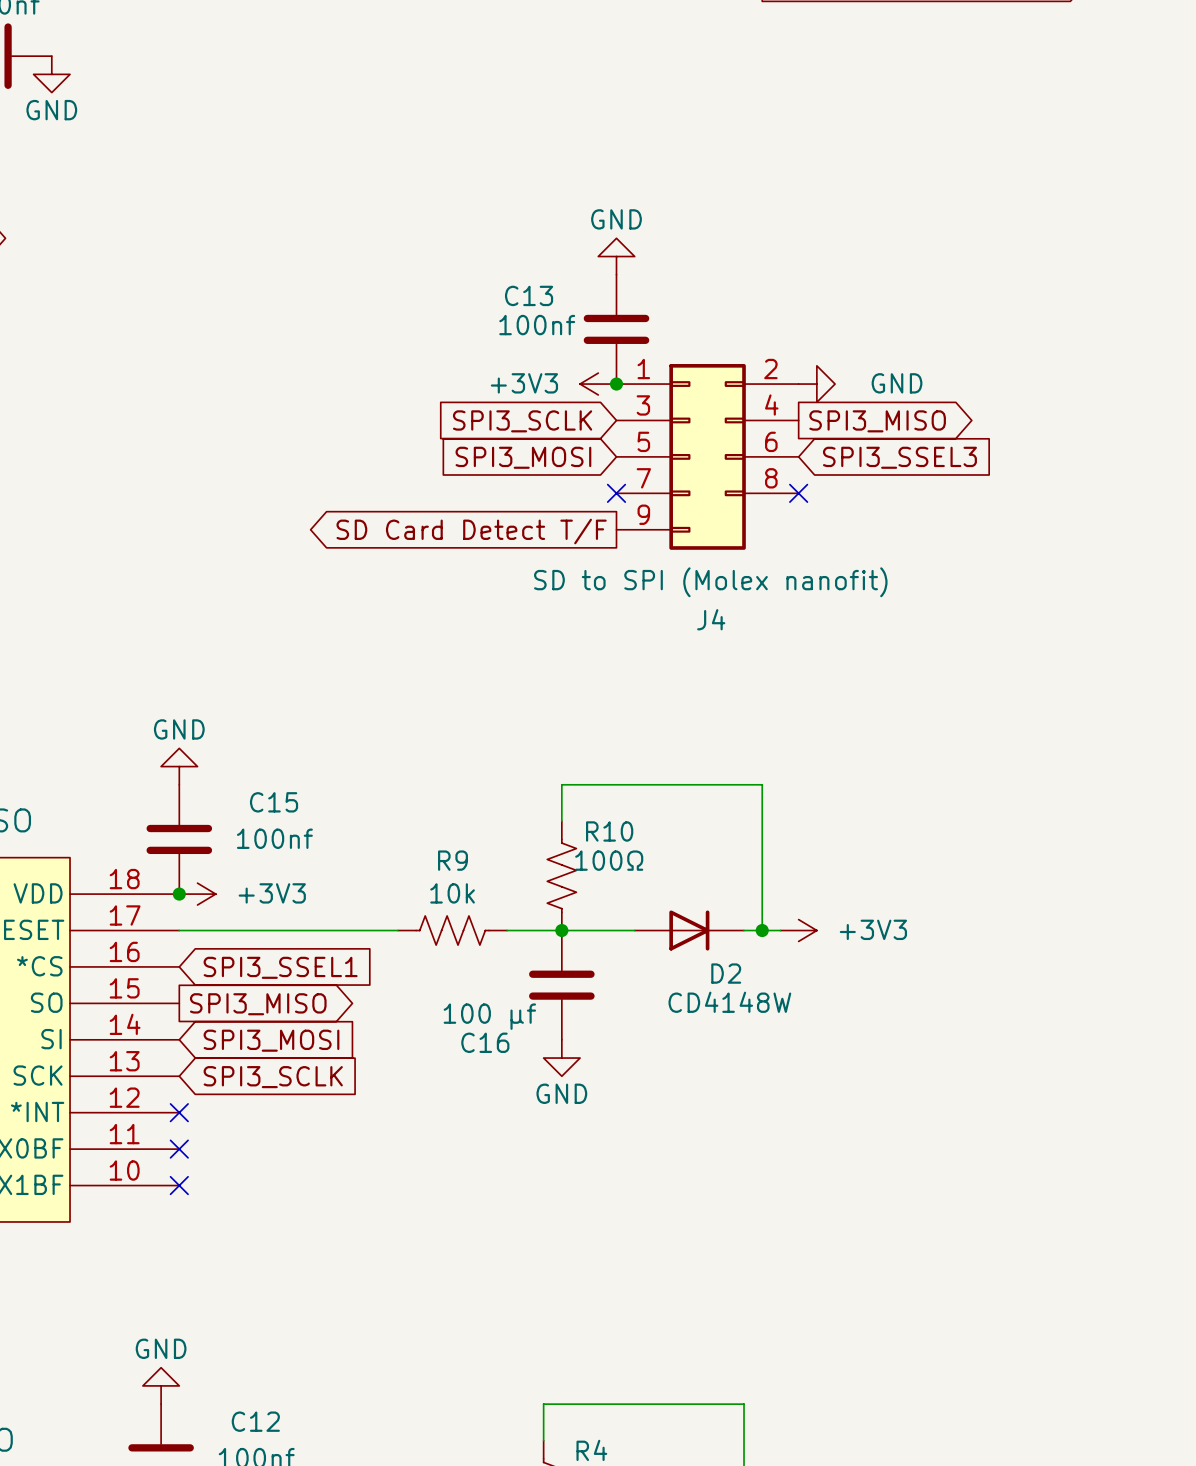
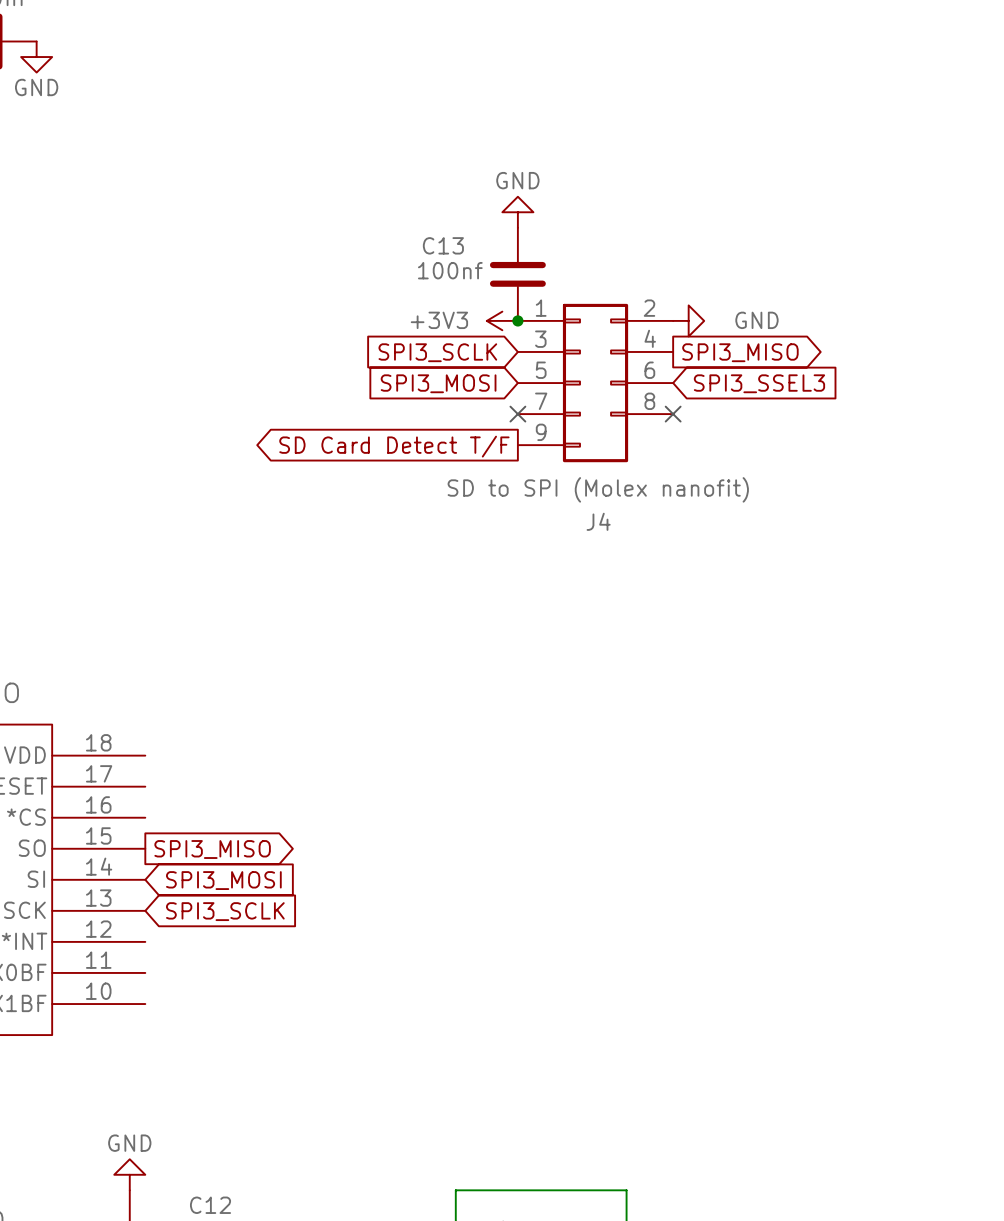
power symbol: GND (179, 766) -> none
wire: (561, 821) (561, 784) (762, 784) (762, 930) -> none
C15: 100nf (179, 839) -> none
R10: 100Ω (561, 875) -> none
junction: (179, 894) -> none
power symbol: +3V3 (197, 894) -> none
wire: (179, 930) (397, 930) -> none
R9: 10k (452, 930) -> none
wire: (507, 930) (634, 930) -> none
junction: (561, 930) -> none
D2: CD4148W (689, 930) -> none
wire: (744, 930) (780, 930) -> none
junction: (762, 930) -> none
power symbol: +3V3 (798, 930) -> none
global label: SPI3_SSEL1 (280, 967) -> none
C16: 100 μf (561, 985) -> none
power symbol: GND (561, 1058) -> none
no-connect mark: (179, 1112) -> none
no-connect mark: (179, 1149) -> none
no-connect mark: (179, 1185) -> none

